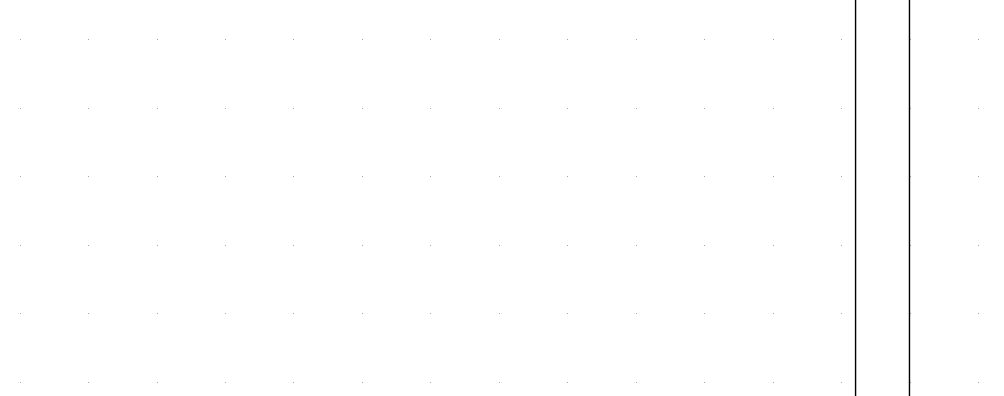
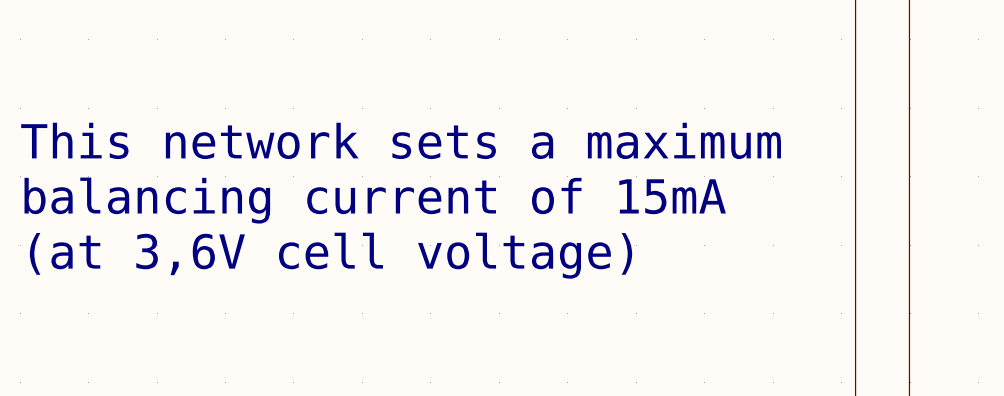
text: none -> This network sets a maximum (401, 140)
text: none -> balancing current of 15mA (375, 200)
text: none -> (at 3,6V cell voltage) (331, 255)

